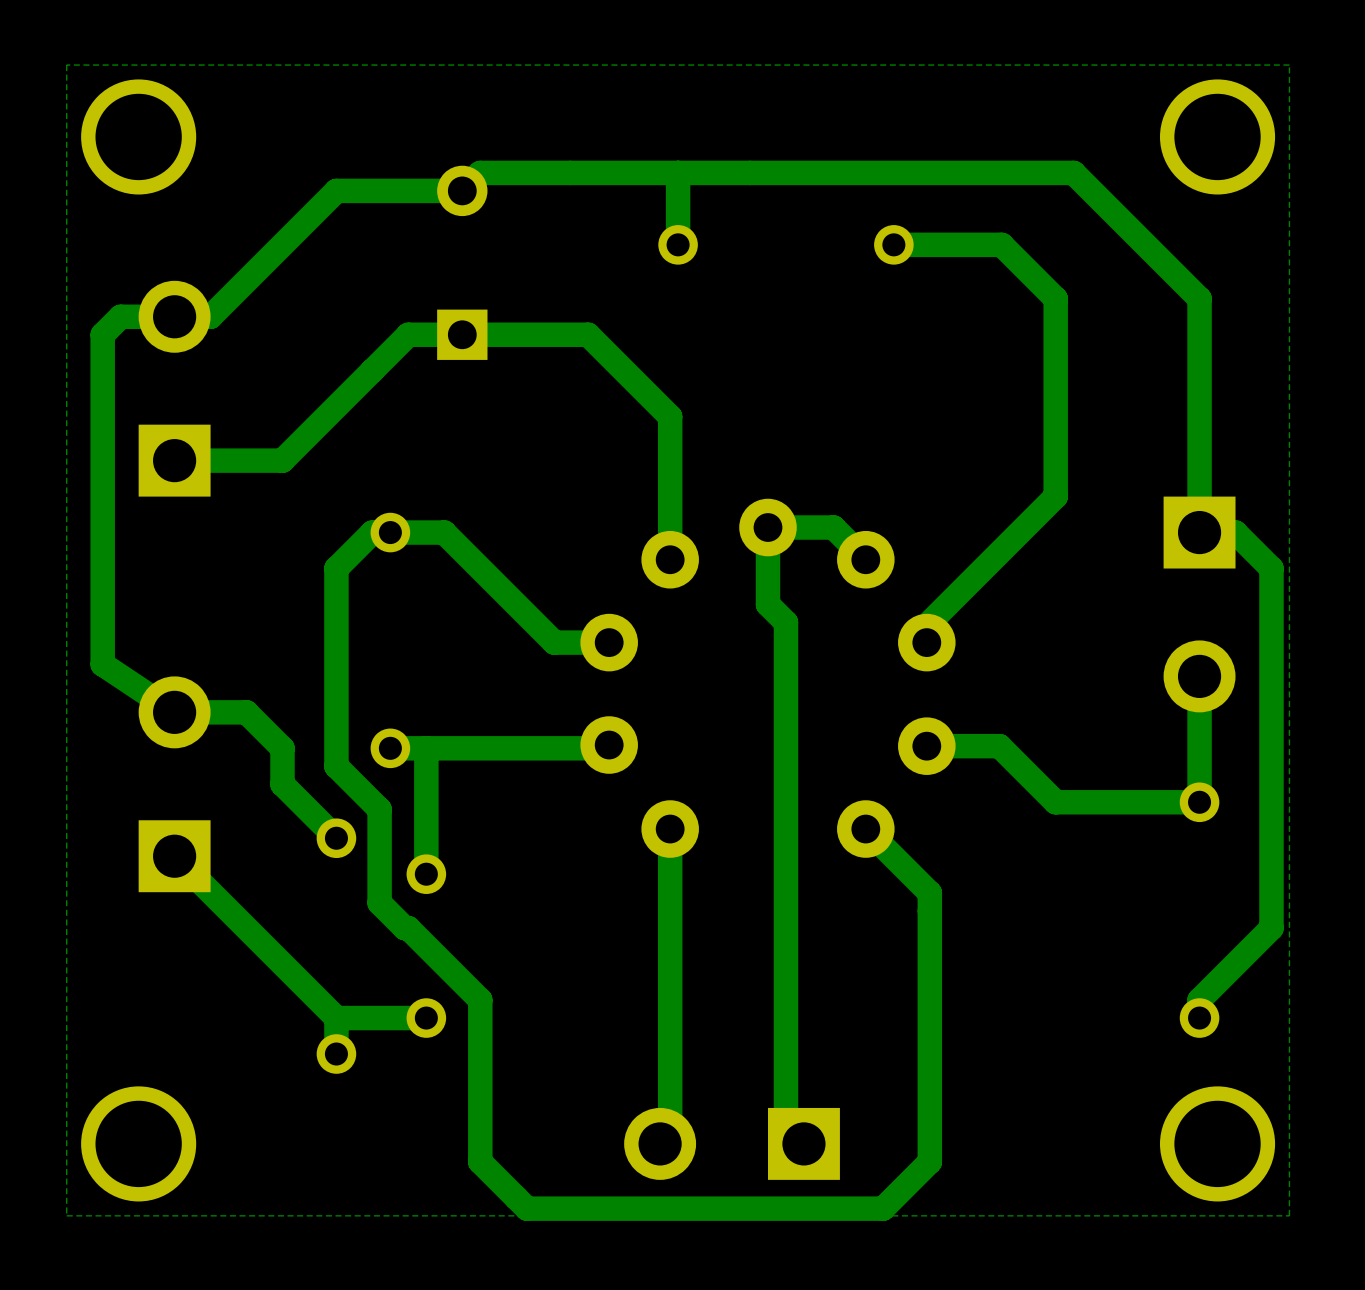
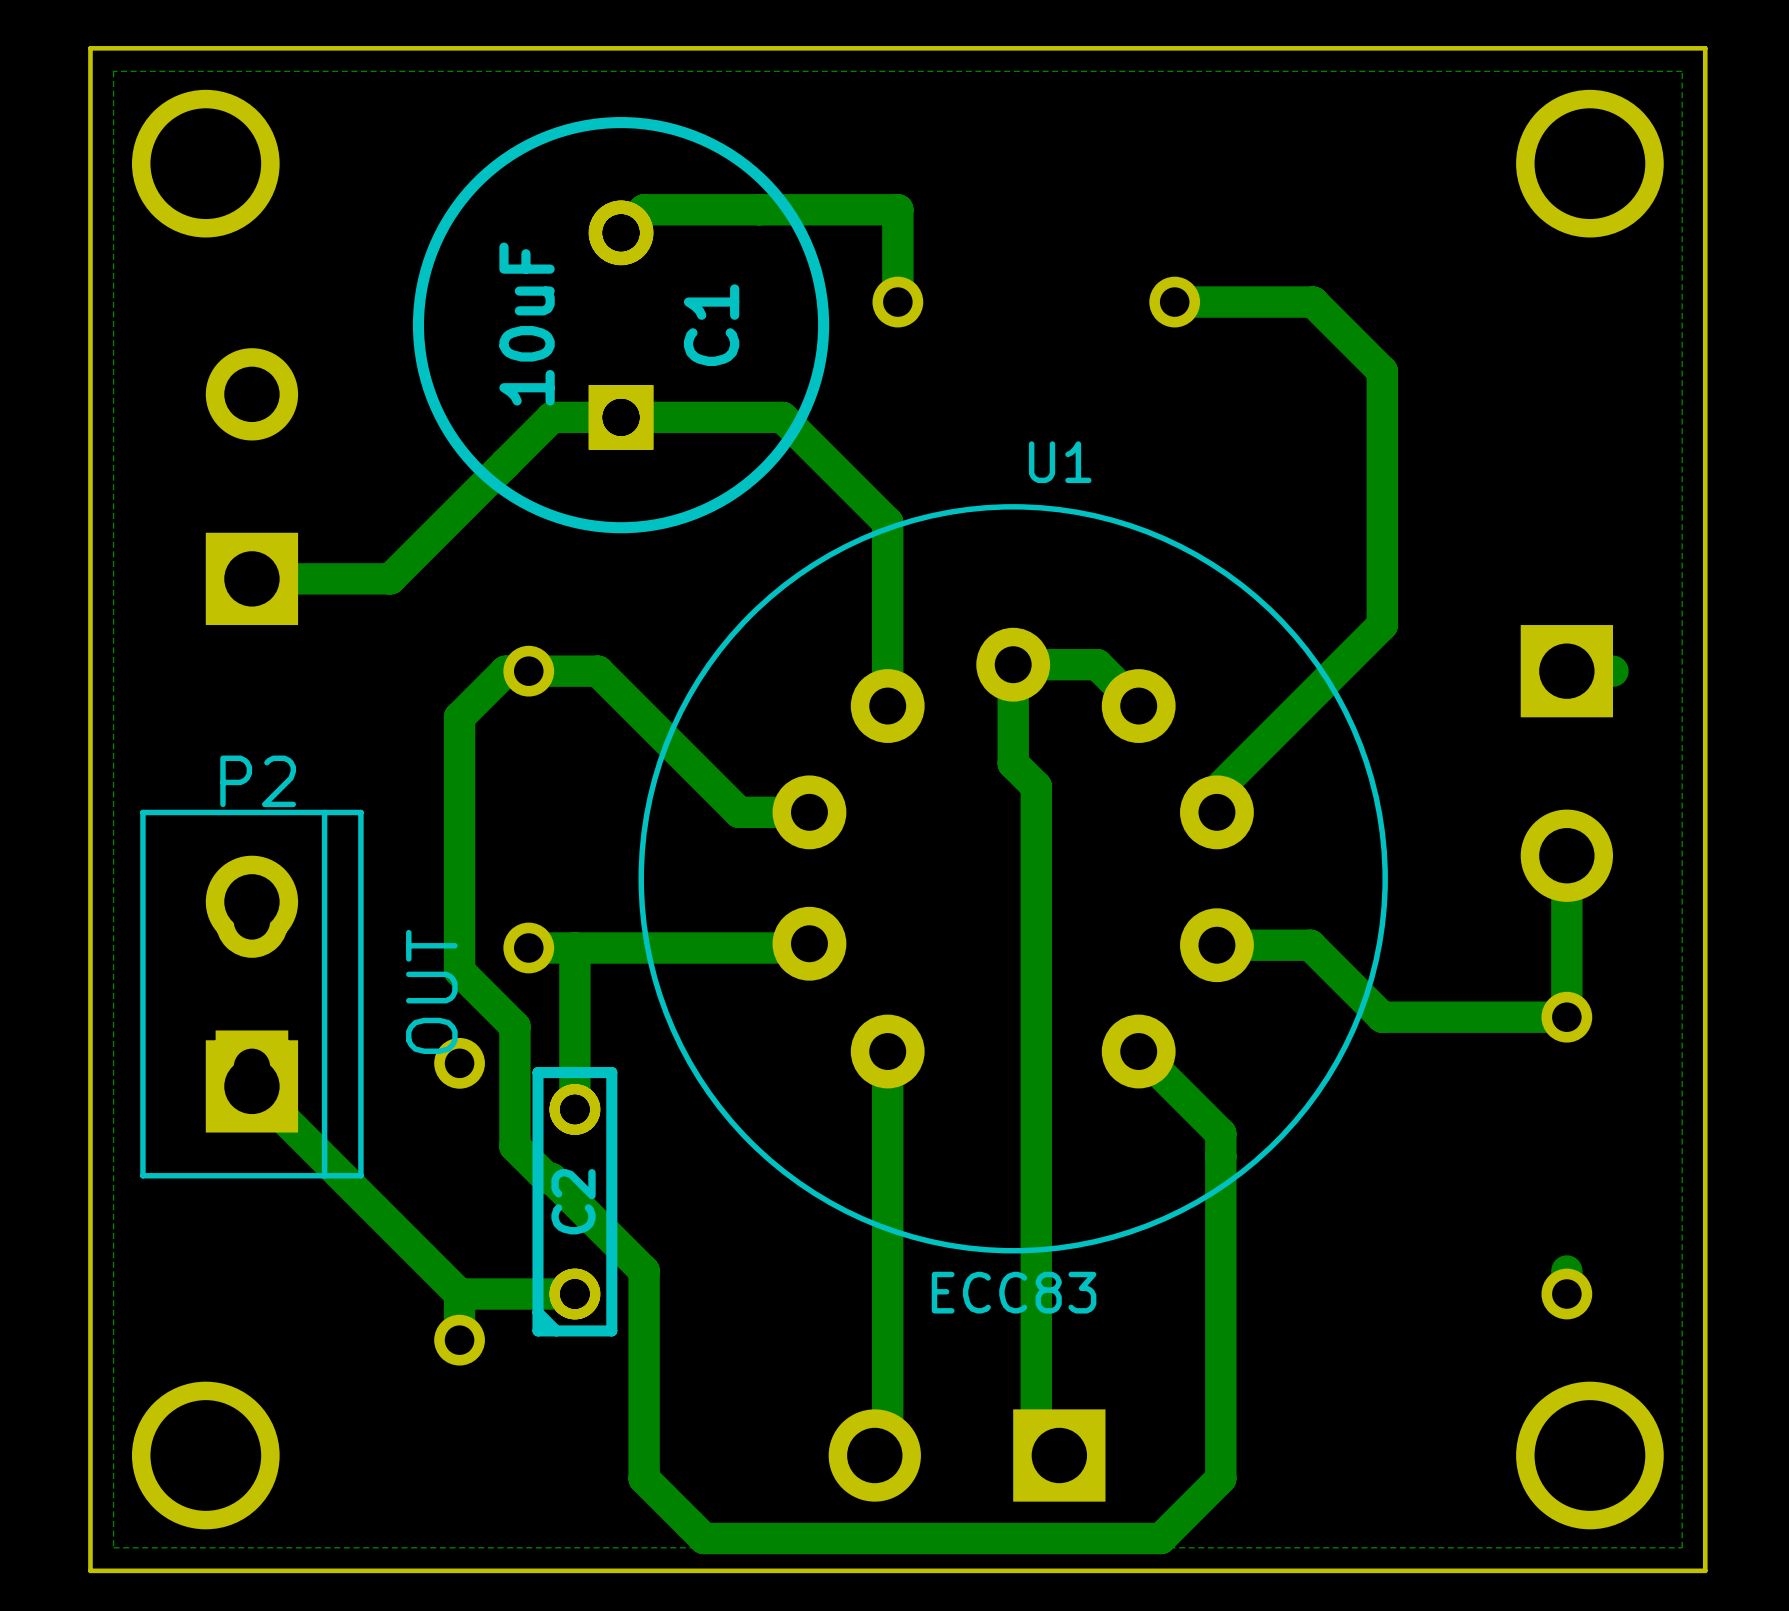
board edge: none -> (90, 48) (1705, 48) (1705, 1570) (90, 1570) (90, 48)
bottom track: (678, 172) (1073, 172) (1199, 298) (1199, 532) -> none
bottom track: (462, 190) (336, 190) (210, 316) (120, 316) (102, 334) (102, 664) (174, 712) (246, 712) (282, 748) (282, 784) (336, 838) -> none
C1: none -> 10uF (621, 325)
bottom track: (1235, 532) (1271, 568) (1271, 928) (1199, 1000) -> none
U1: none -> ECC83 (1013, 878)
P2: none -> OUT (251, 994)
C2: none -> (574, 1201)

